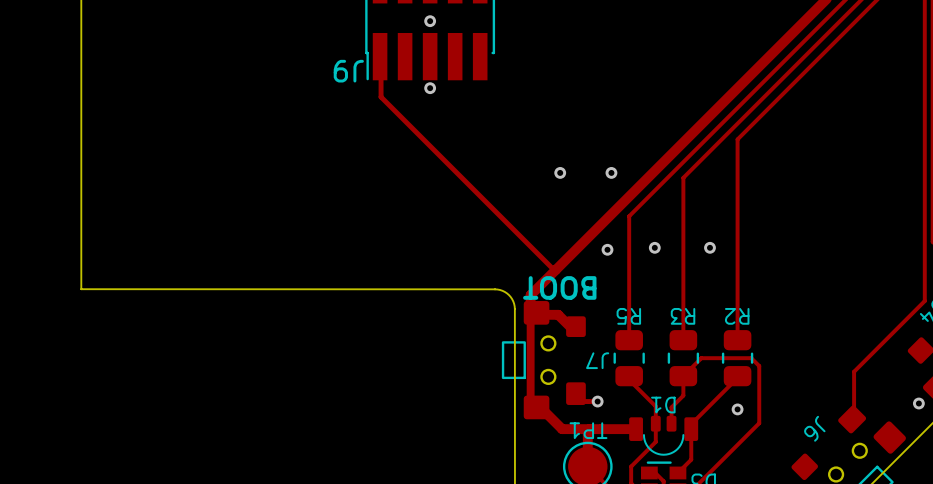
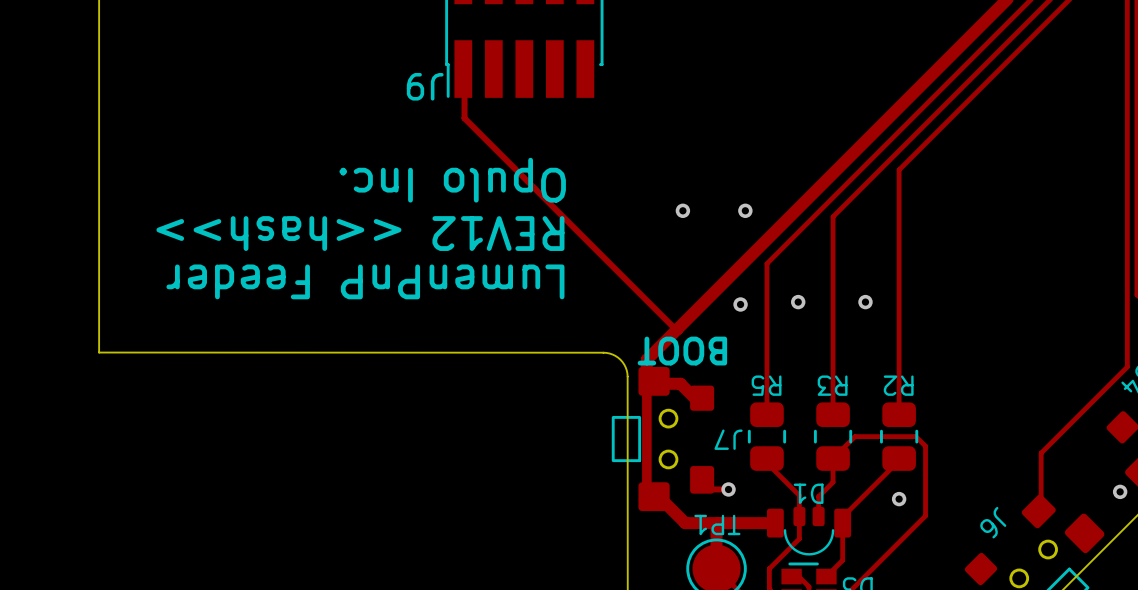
via: (430, 21) -> none
via: (430, 88) -> none
text: none -> Opulo Inc. (452, 180)
text: none -> REV12 <<hash>> (360, 233)
text: none -> LumenPnP Feeder (365, 281)

